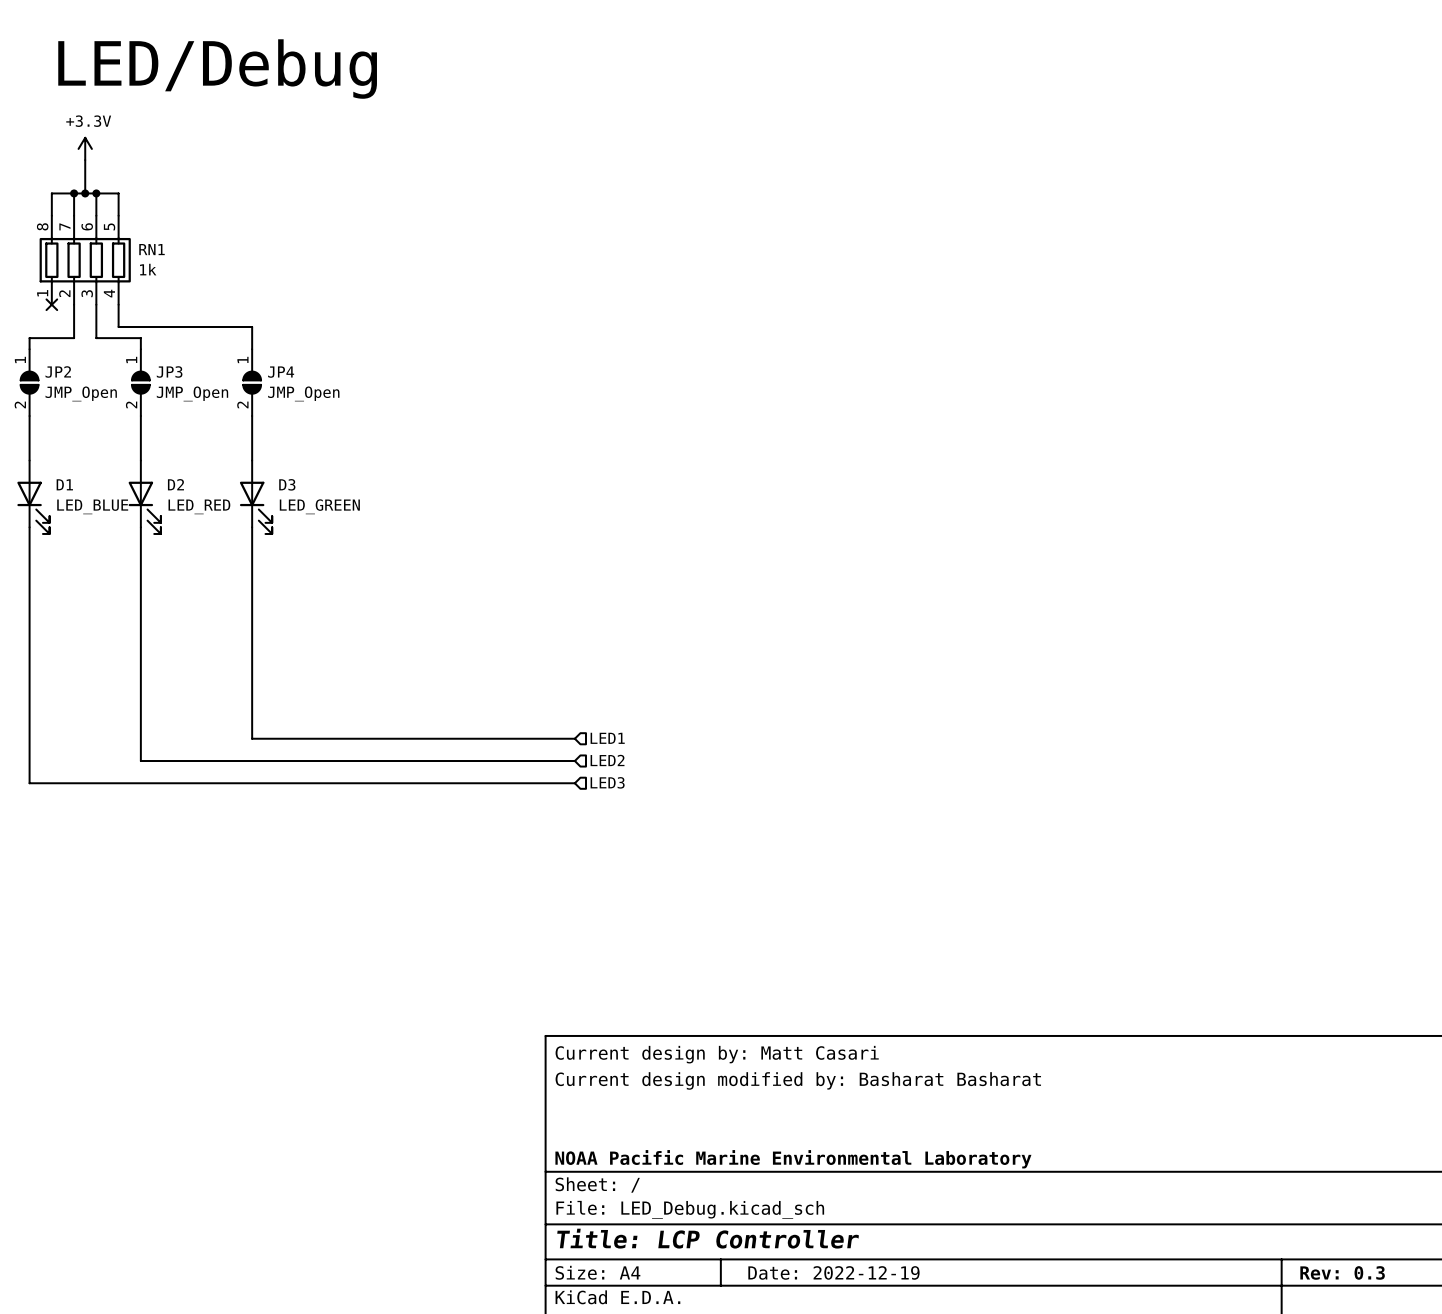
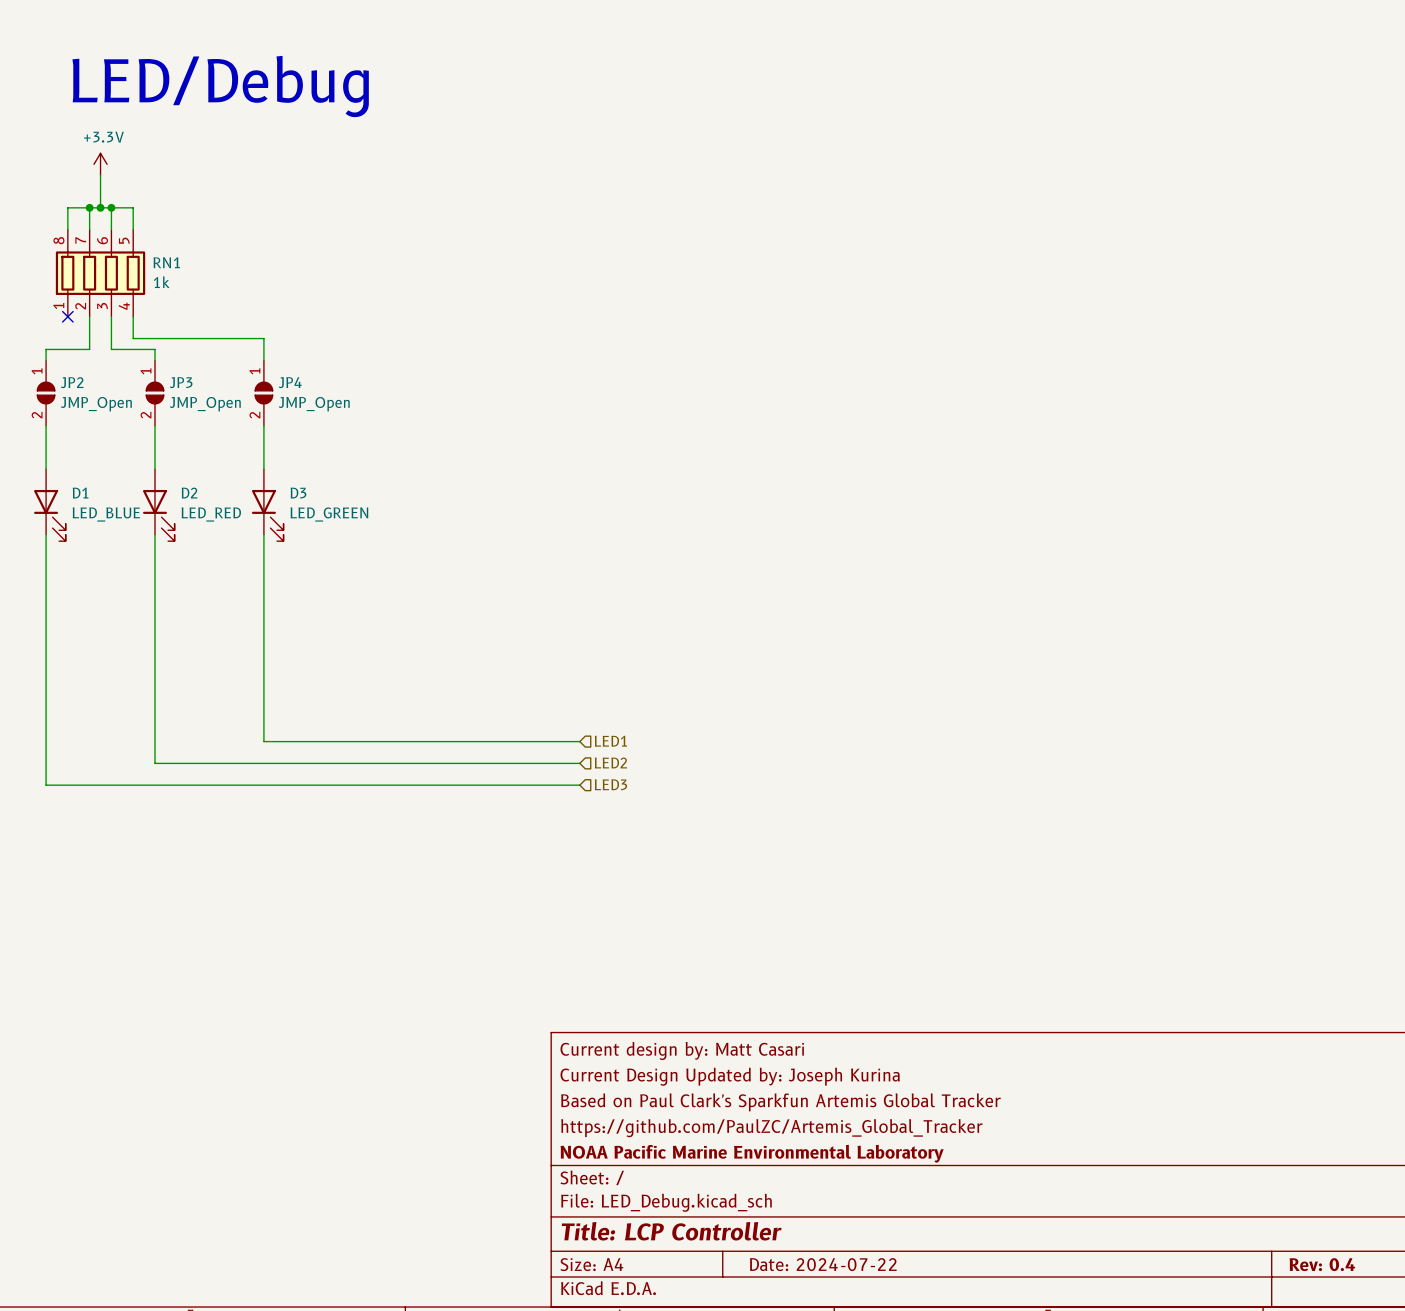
title block: Current design modified by: Basharat Basharat (798, 1080) -> Current Design Updated by: Joseph Kurina (730, 1076)
title block: none -> Based on Paul Clark's Sparkfun Artemis Global Tracker (780, 1102)
title block: none -> https://github.com/PaulZC/Artemis_Global_Tracker (771, 1128)
title block: Date: 2022-12-19 (833, 1272) -> Date: 2024-07-22 (823, 1264)
title block: Rev: 0.3 (1342, 1272) -> Rev: 0.4 (1322, 1264)

